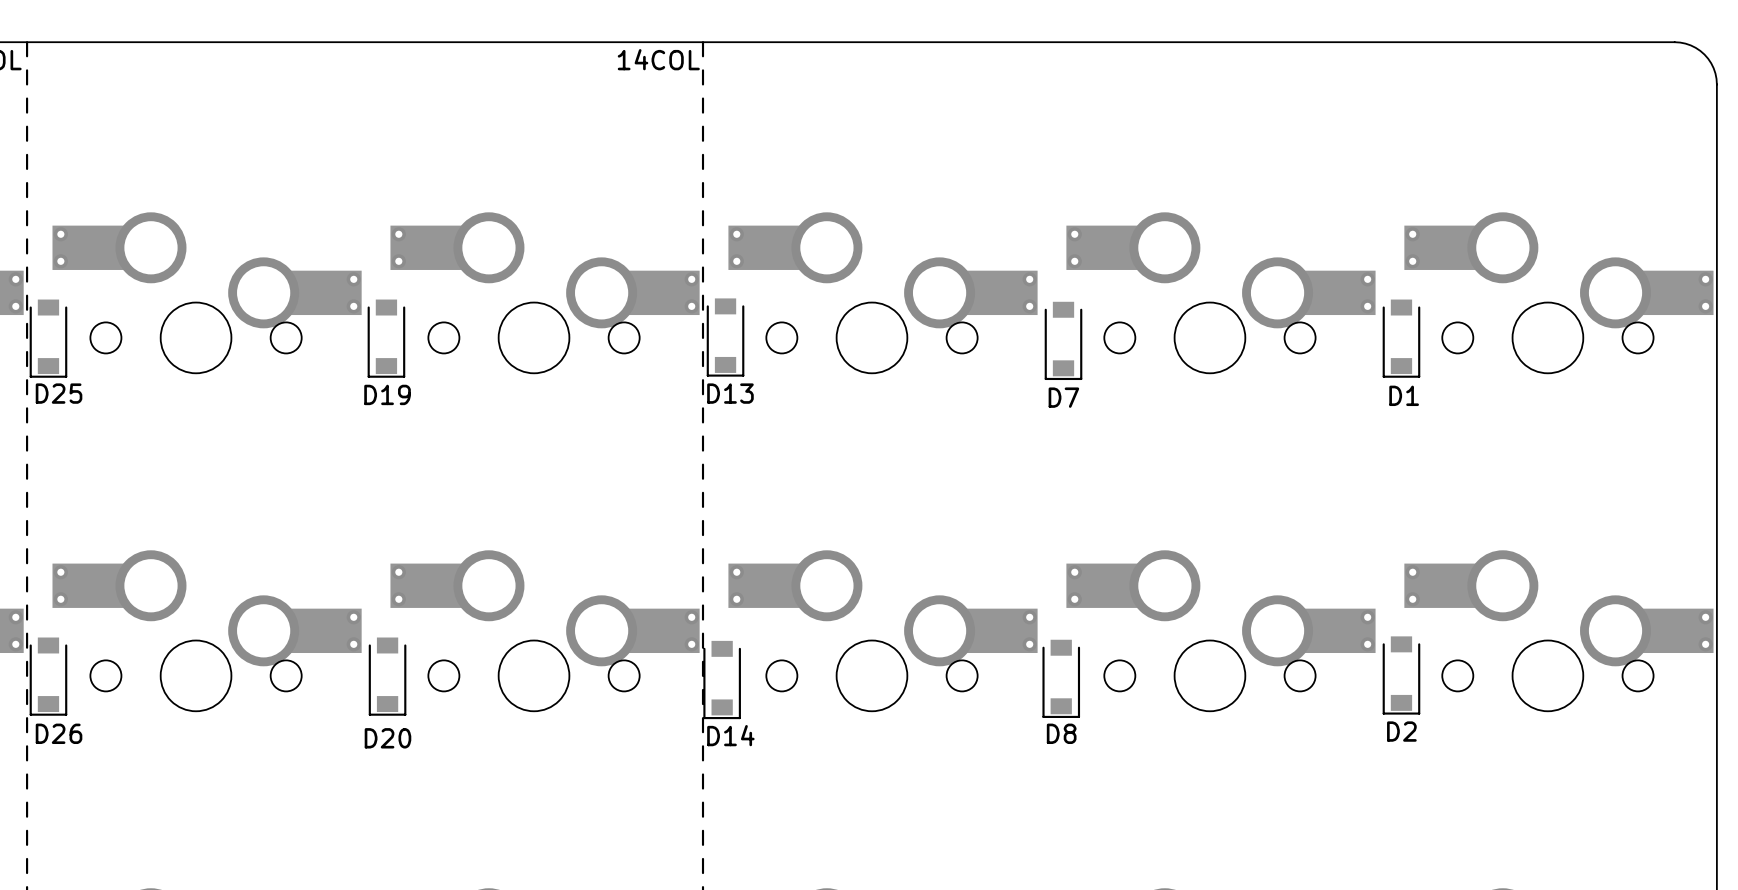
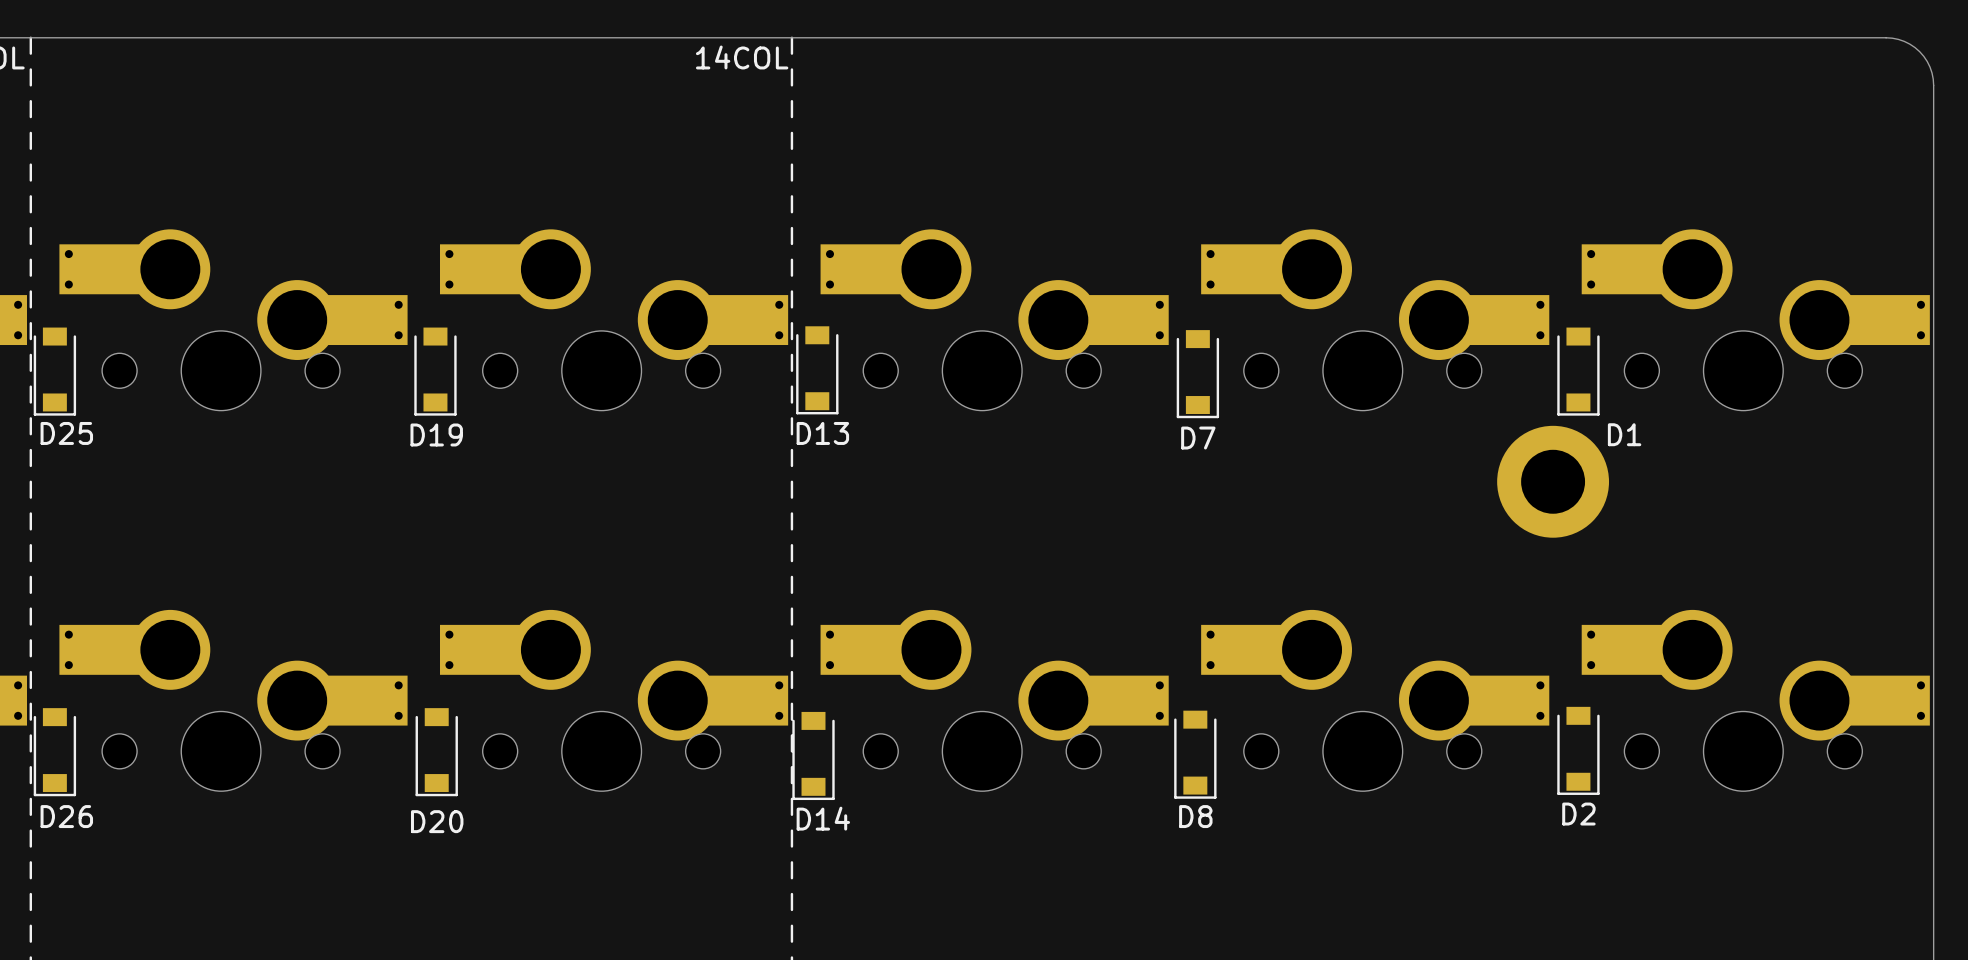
D1 name position: D1 (1404, 395) -> D1 (1624, 434)
part: none -> (1553, 481)

